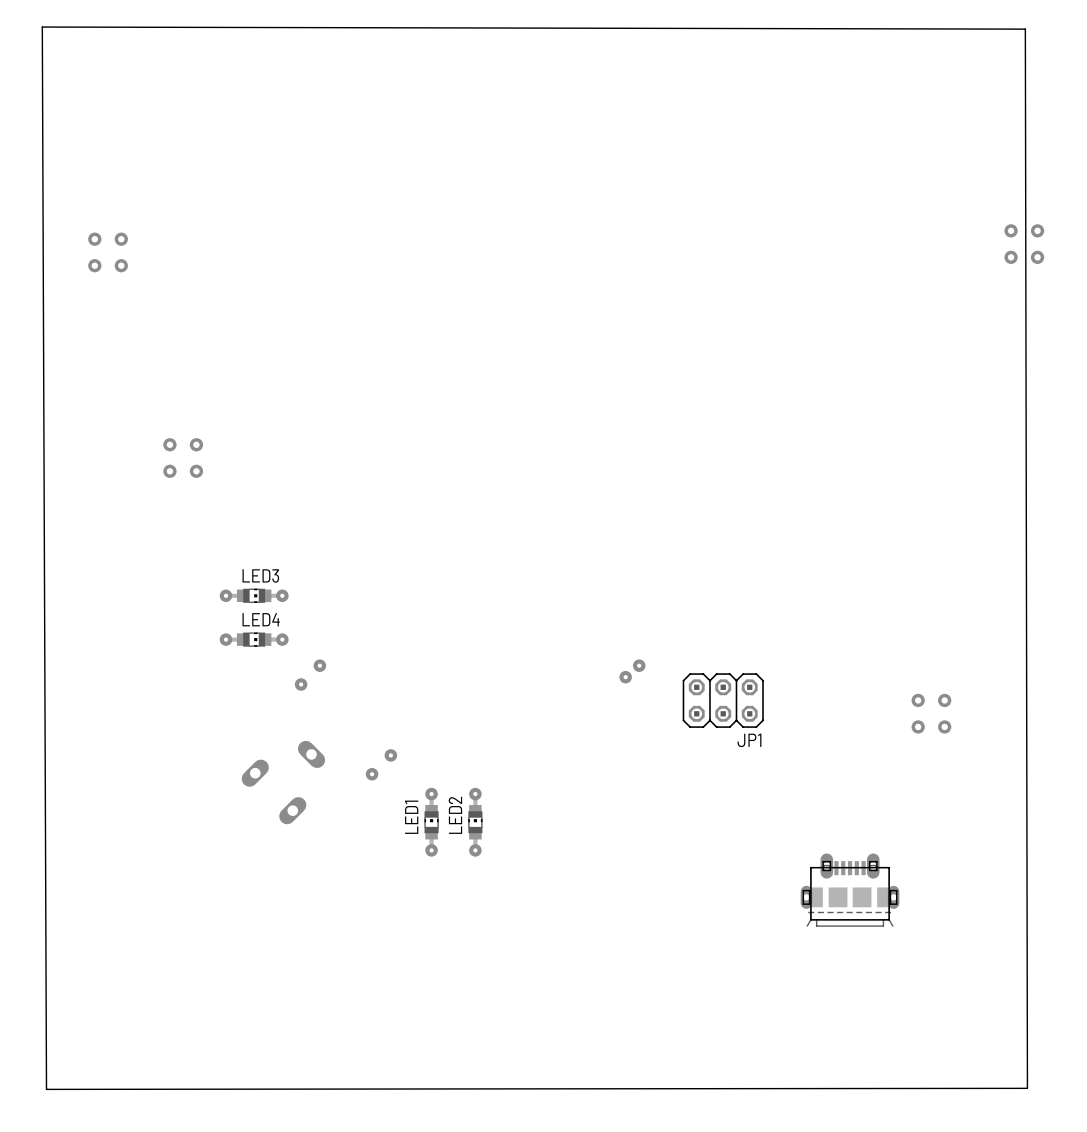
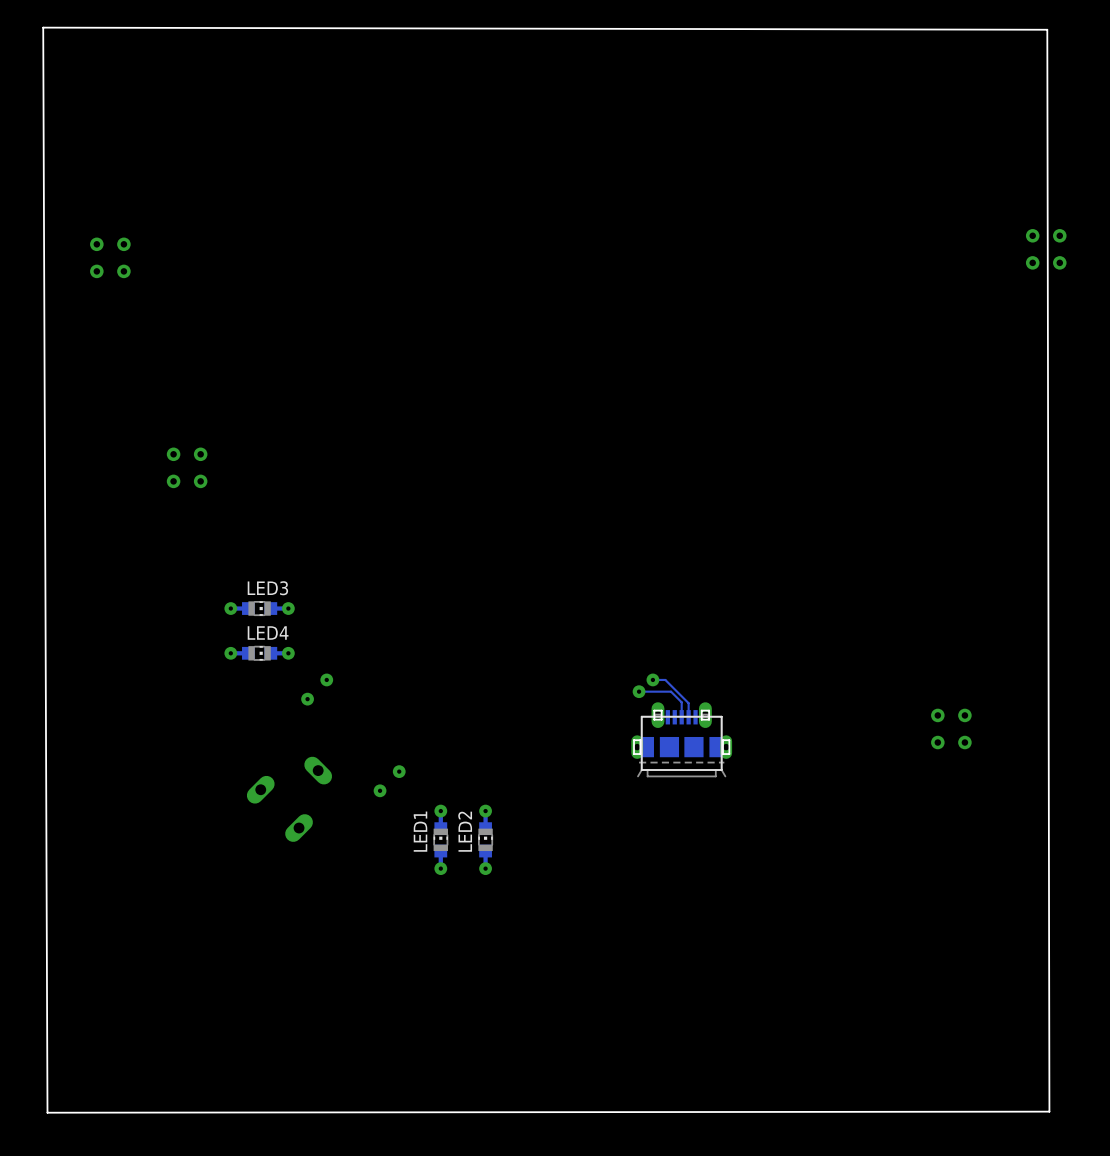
track: none -> (652, 679) (665, 679) (688, 703) (688, 717)
track: none -> (639, 691) (671, 691) (681, 702) (681, 717)
JP1: (723, 700) -> none
part position: (850, 889) -> (681, 739)

